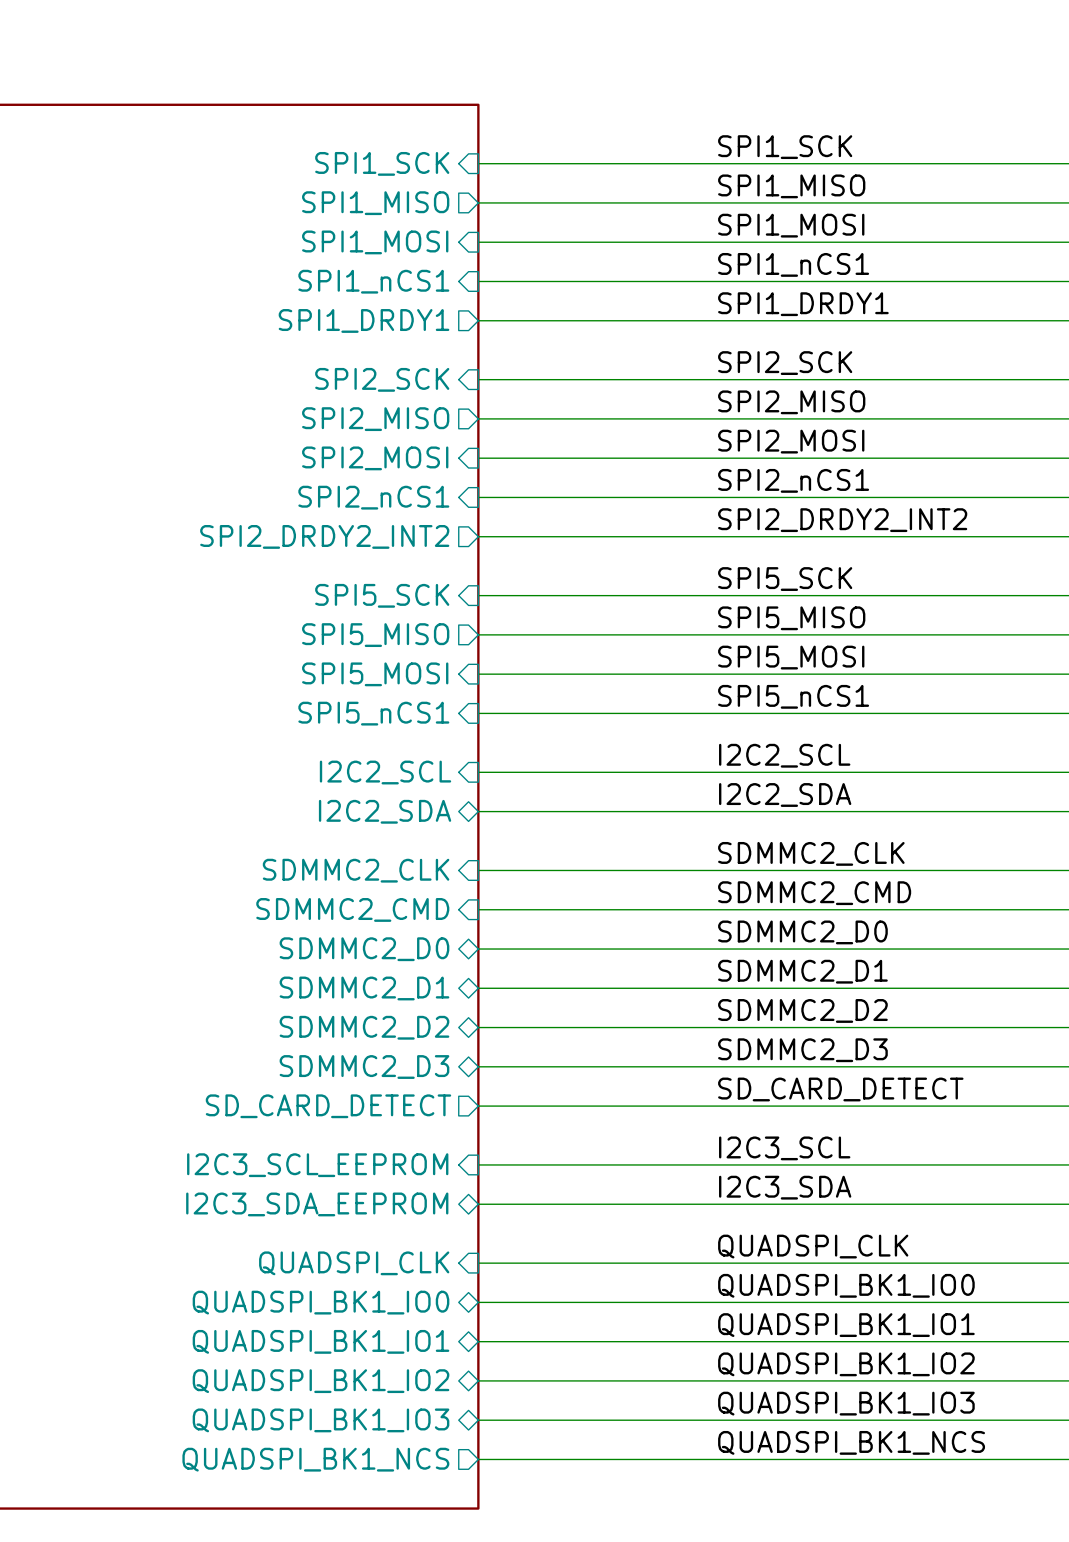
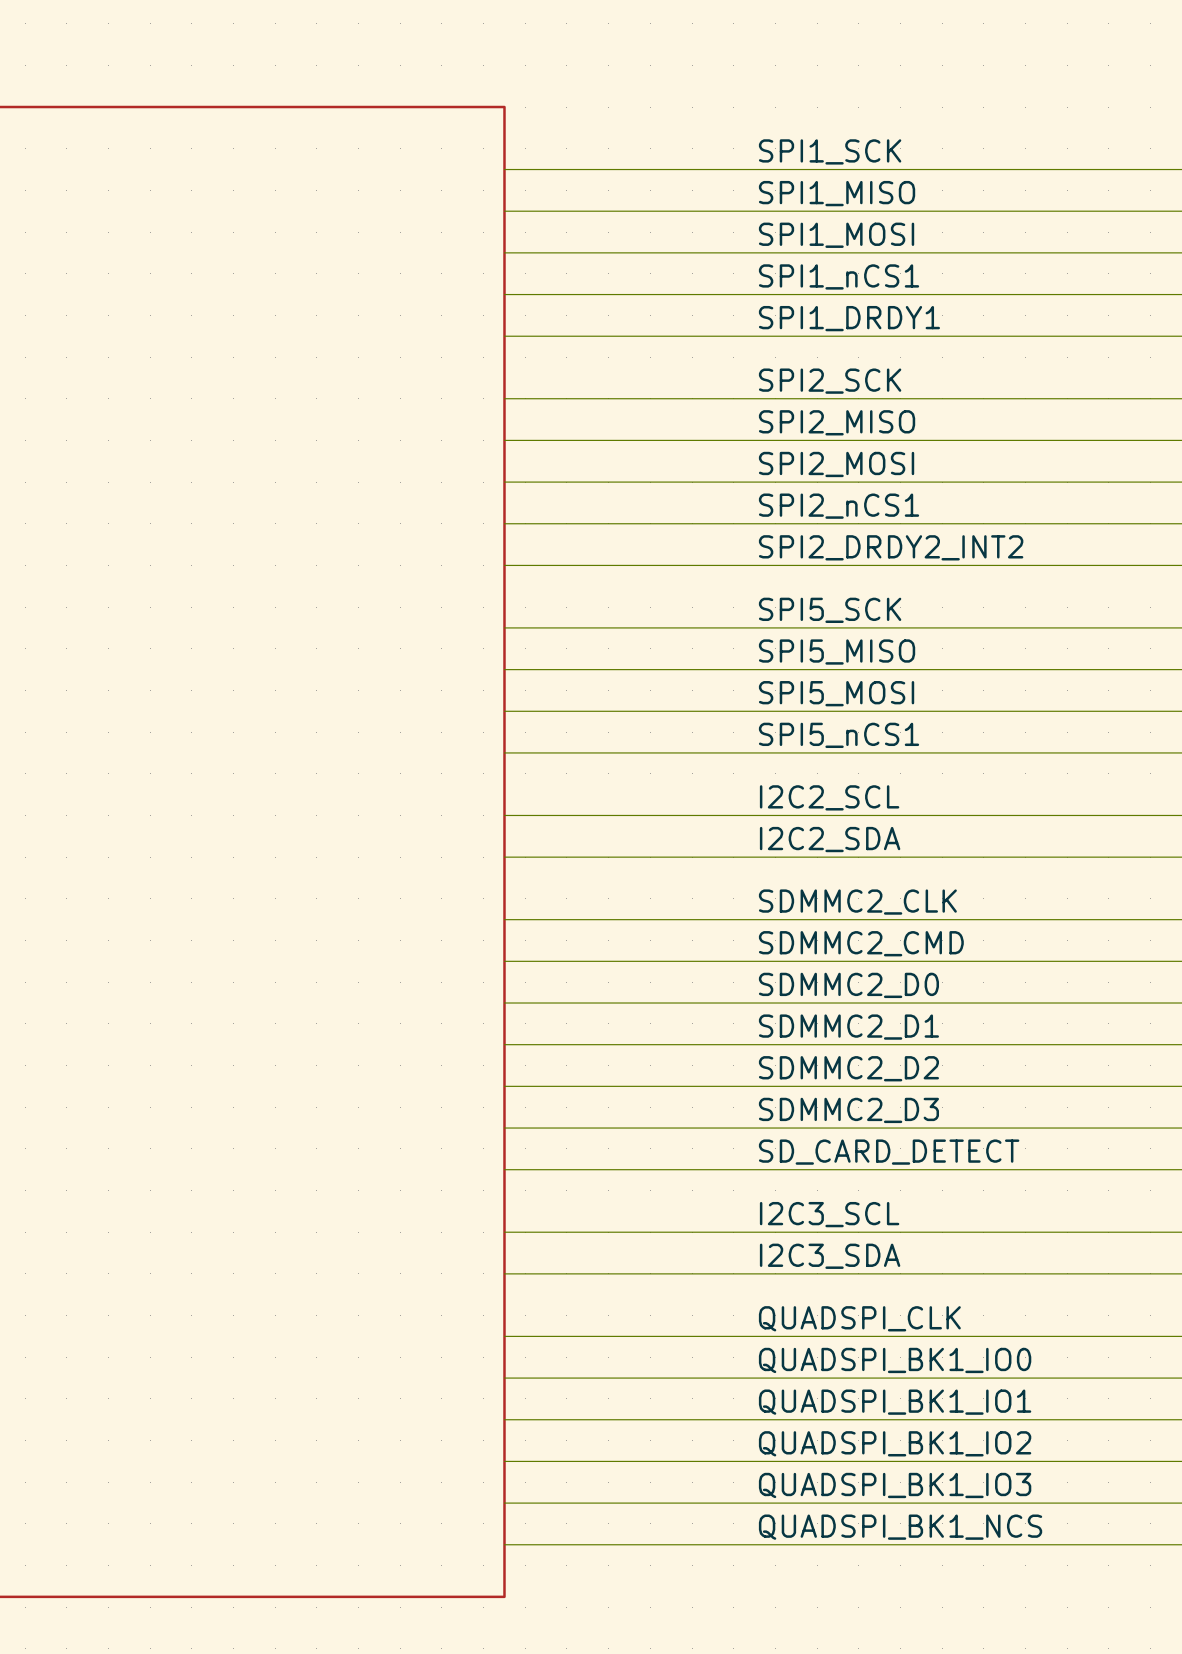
sheet pin: SPI1_SCK (382, 163) -> none
sheet pin: SPI1_MISO (375, 203) -> none
sheet pin: SPI1_MOSI (375, 242) -> none
sheet pin: SPI1_nCS1 (373, 281) -> none
sheet pin: SPI1_DRDY1 (364, 320) -> none
sheet pin: SPI2_SCK (382, 379) -> none
sheet pin: SPI2_MISO (375, 419) -> none
sheet pin: SPI2_MOSI (375, 458) -> none
sheet pin: SPI2_nCS1 (373, 497) -> none
sheet pin: SPI2_DRDY2_INT2 (324, 536) -> none
sheet pin: SPI5_SCK (382, 595) -> none
sheet pin: SPI5_MISO (375, 635) -> none
sheet pin: SPI5_MOSI (375, 674) -> none
sheet pin: SPI5_nCS1 (373, 713) -> none
sheet pin: I2C2_SCL (385, 772) -> none
sheet pin: I2C2_SDA (385, 811) -> none
sheet pin: SDMMC2_CLK (356, 870) -> none
sheet pin: SDMMC2_CMD (352, 909) -> none
sheet pin: SDMMC2_D0 (364, 949) -> none
sheet pin: SDMMC2_D1 (364, 988) -> none
sheet pin: SDMMC2_D2 (364, 1027) -> none
sheet pin: SDMMC2_D3 (364, 1067) -> none
sheet pin: SD_CARD_DETECT (328, 1106) -> none
sheet pin: I2C3_SCL_EEPROM (317, 1165) -> none
sheet pin: I2C3_SDA_EEPROM (317, 1204) -> none
sheet pin: QUADSPI_CLK (354, 1263) -> none
sheet pin: QUADSPI_BK1_IO0 (321, 1302) -> none
sheet pin: QUADSPI_BK1_IO1 (321, 1341) -> none
sheet pin: QUADSPI_BK1_IO2 (321, 1381) -> none
sheet pin: QUADSPI_BK1_IO3 (321, 1420) -> none
sheet pin: QUADSPI_BK1_NCS (315, 1459) -> none

